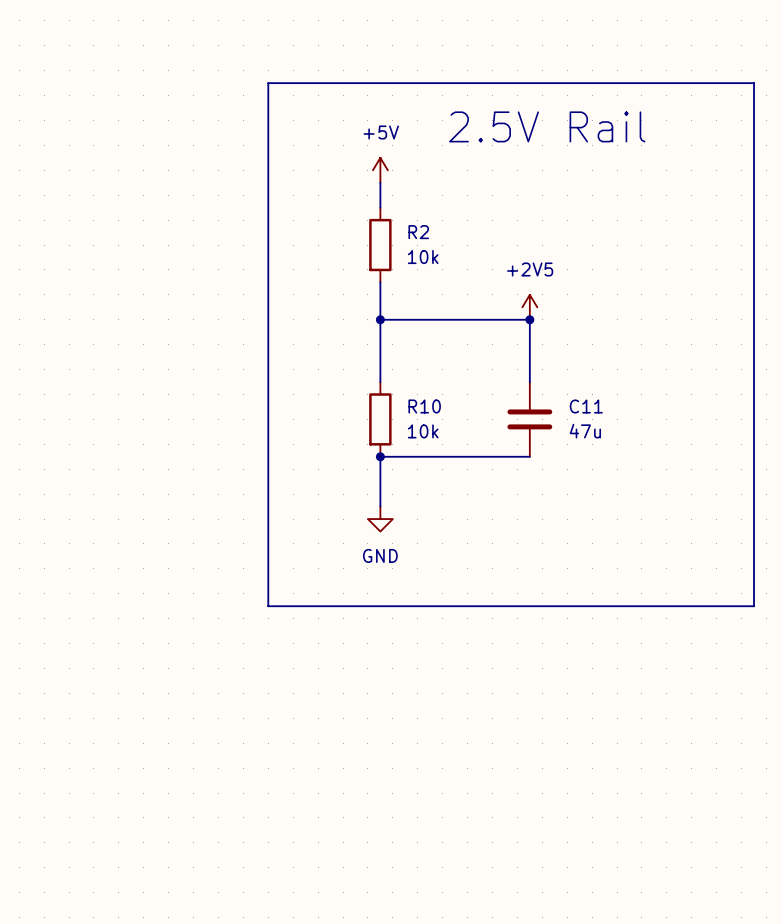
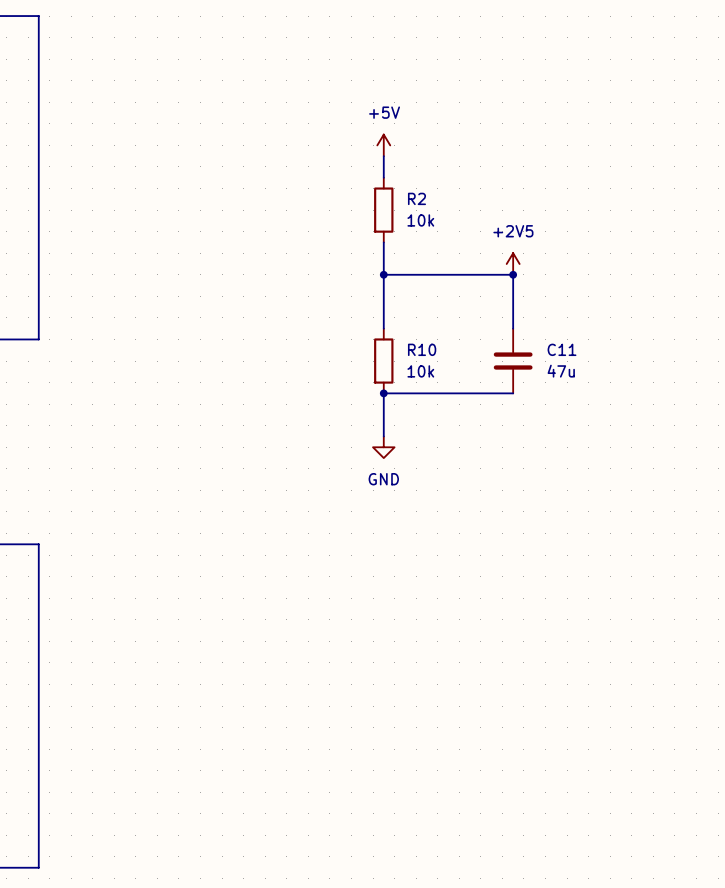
line: (268, 83) (754, 83) (754, 606) (268, 606) (268, 83) -> none
text: 2.5V Rail (547, 126) -> none

